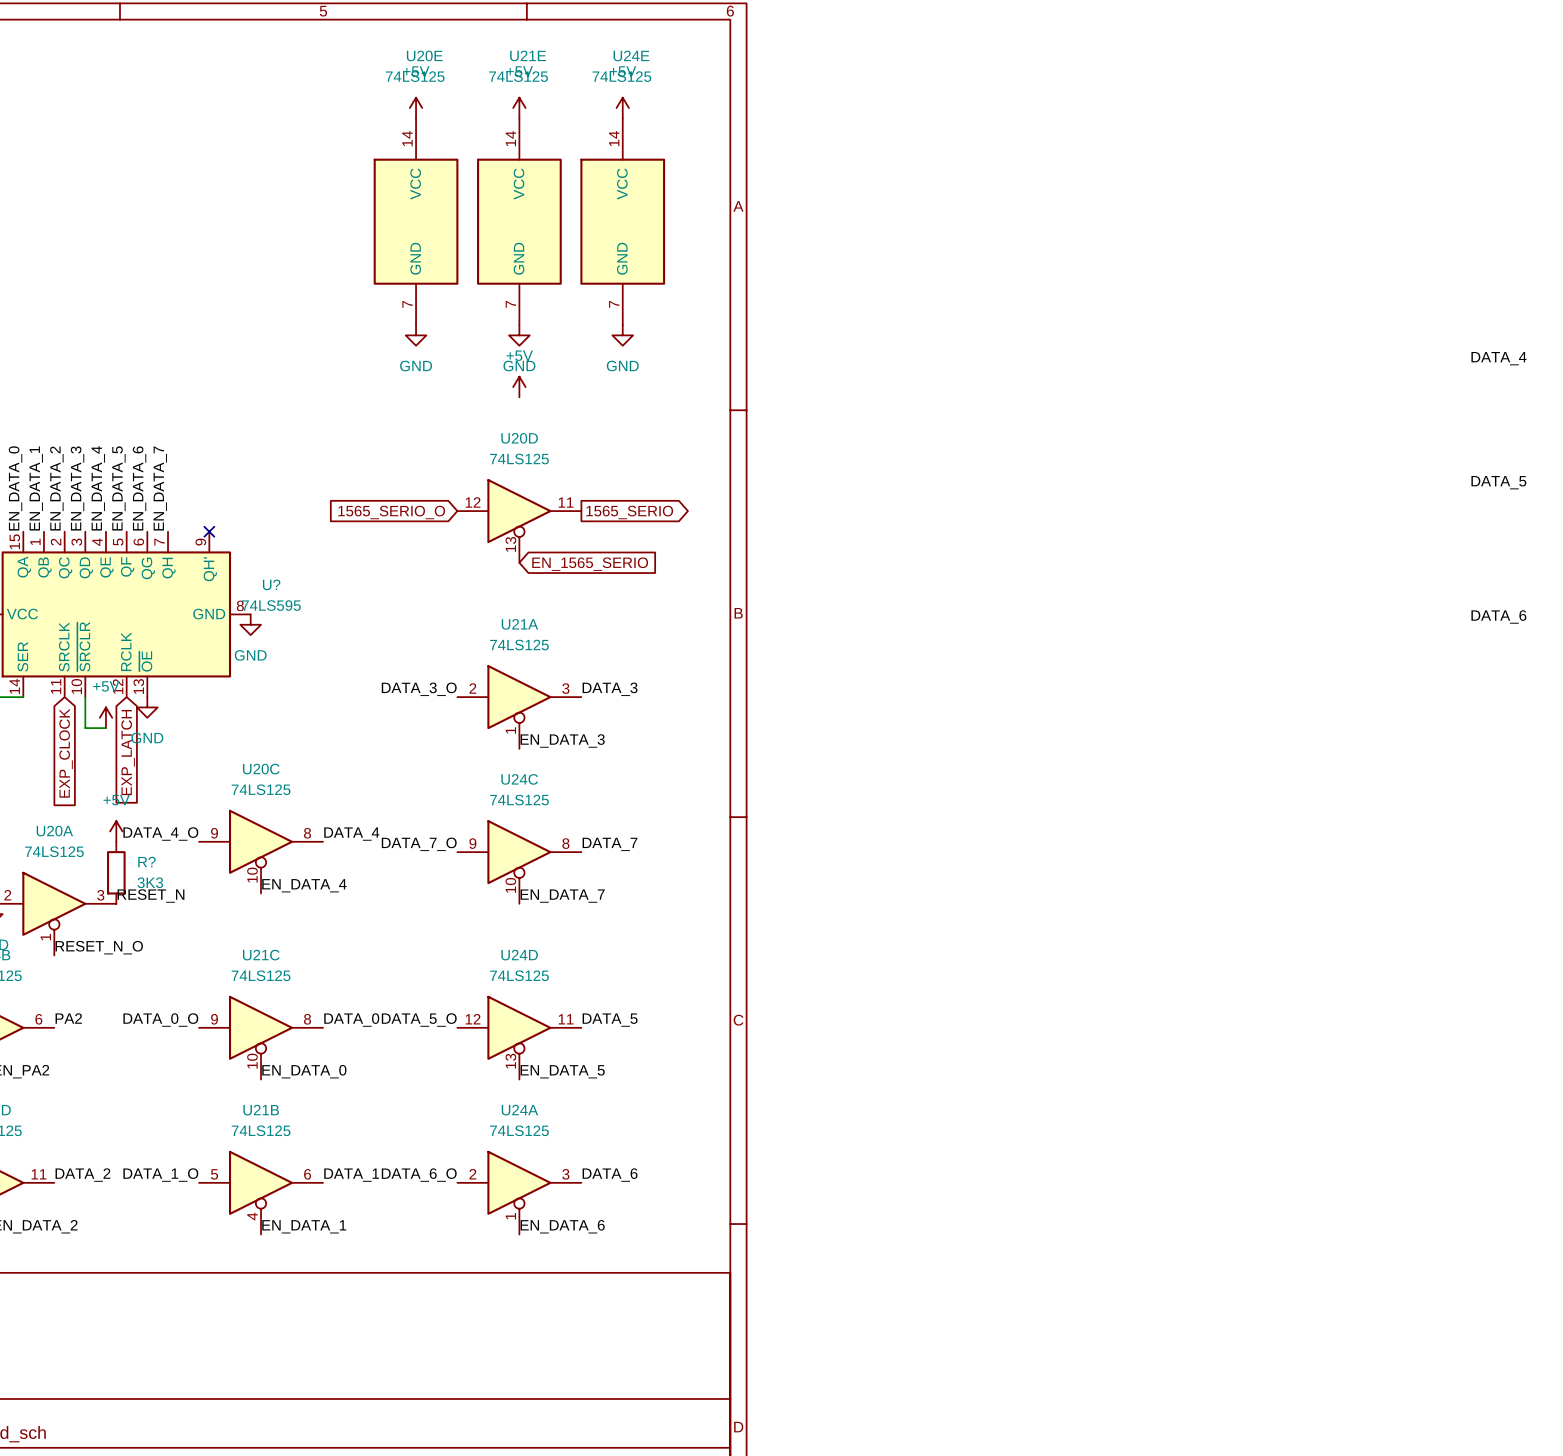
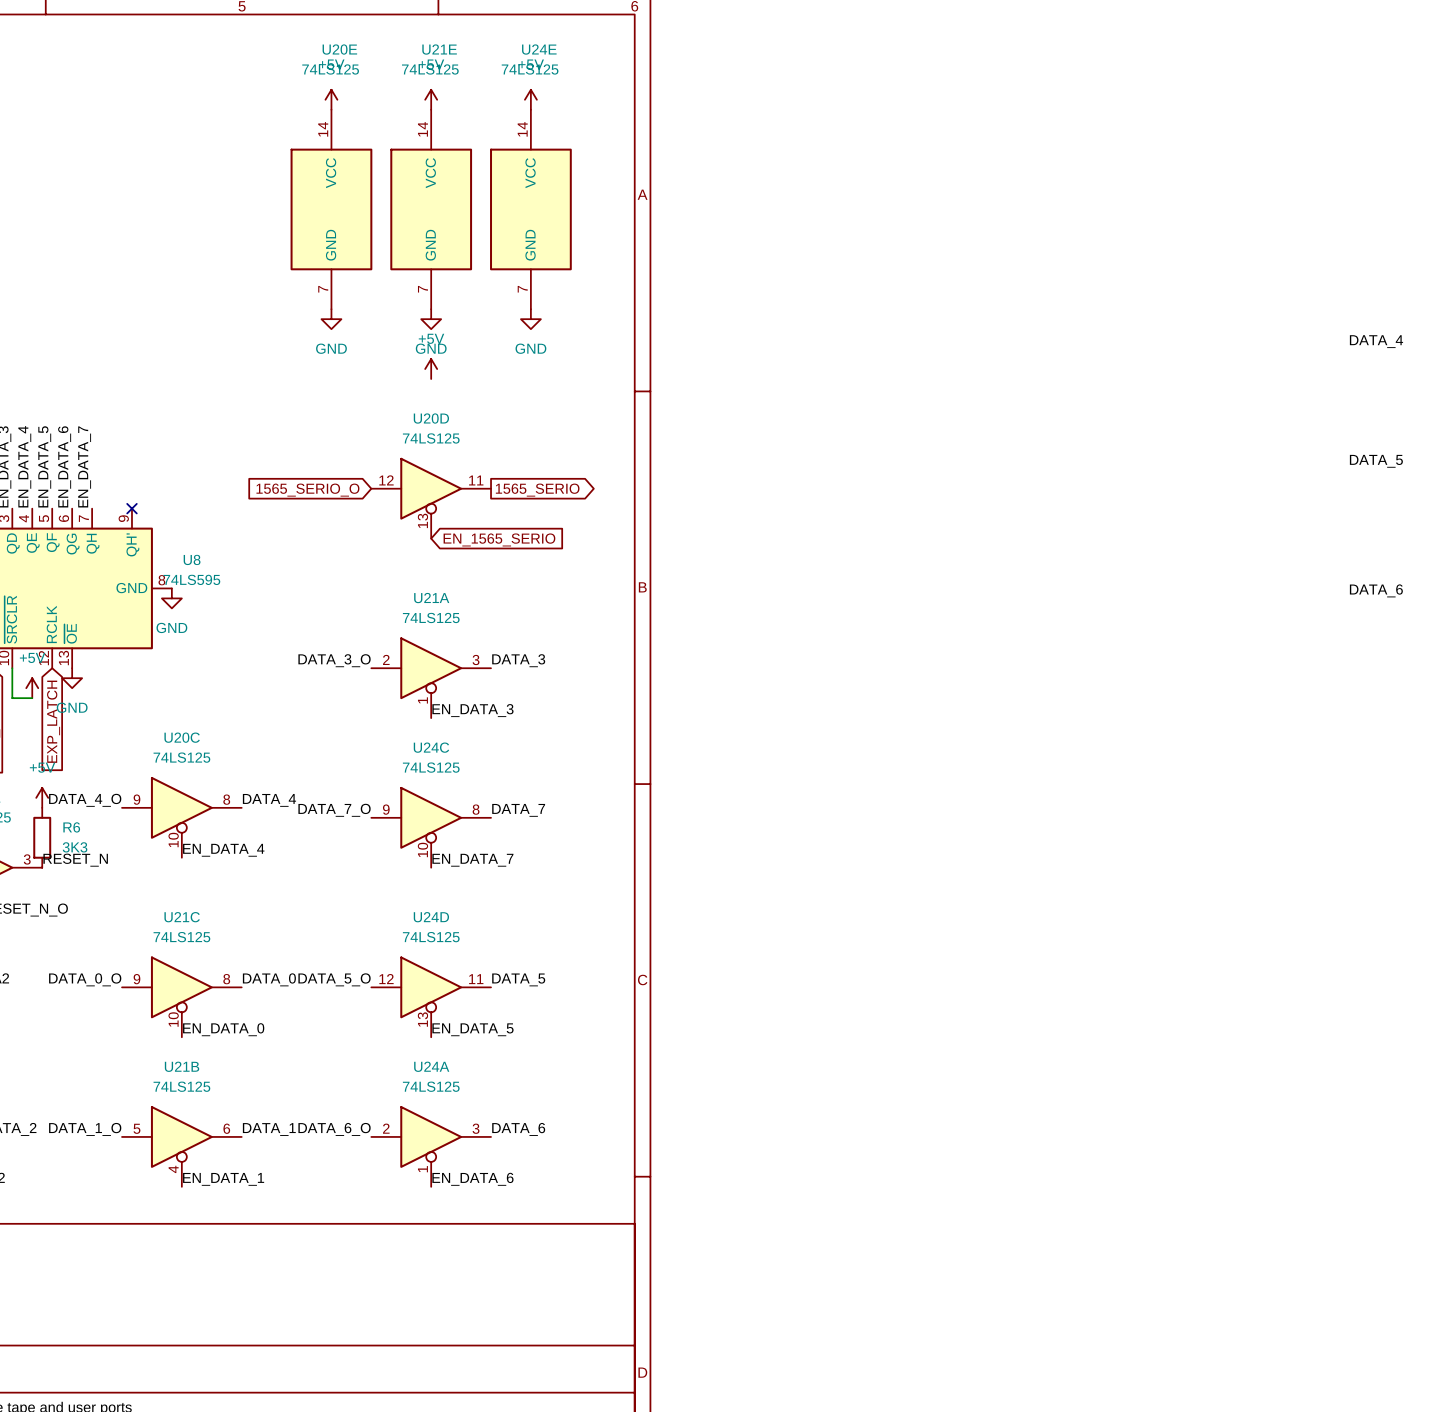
U? name: U? (271, 584) -> U8 (192, 559)
R? name: R? (146, 862) -> R6 (71, 827)

